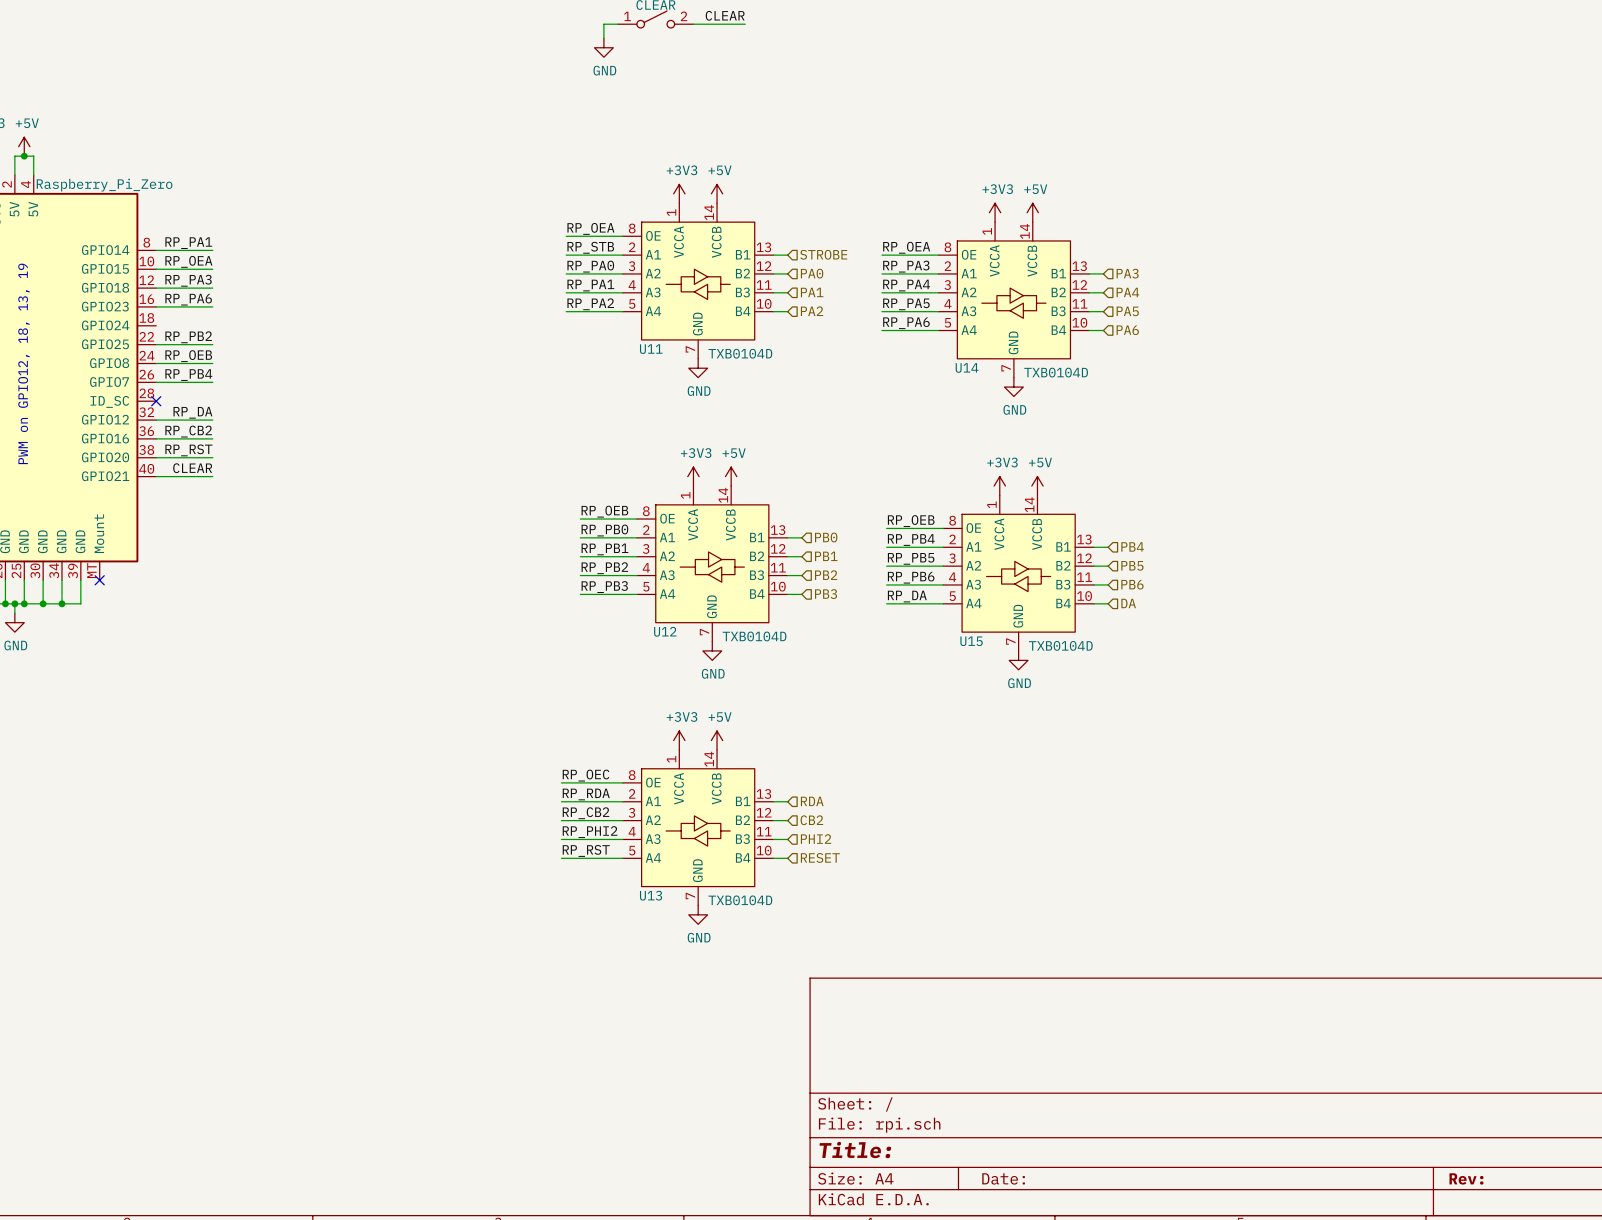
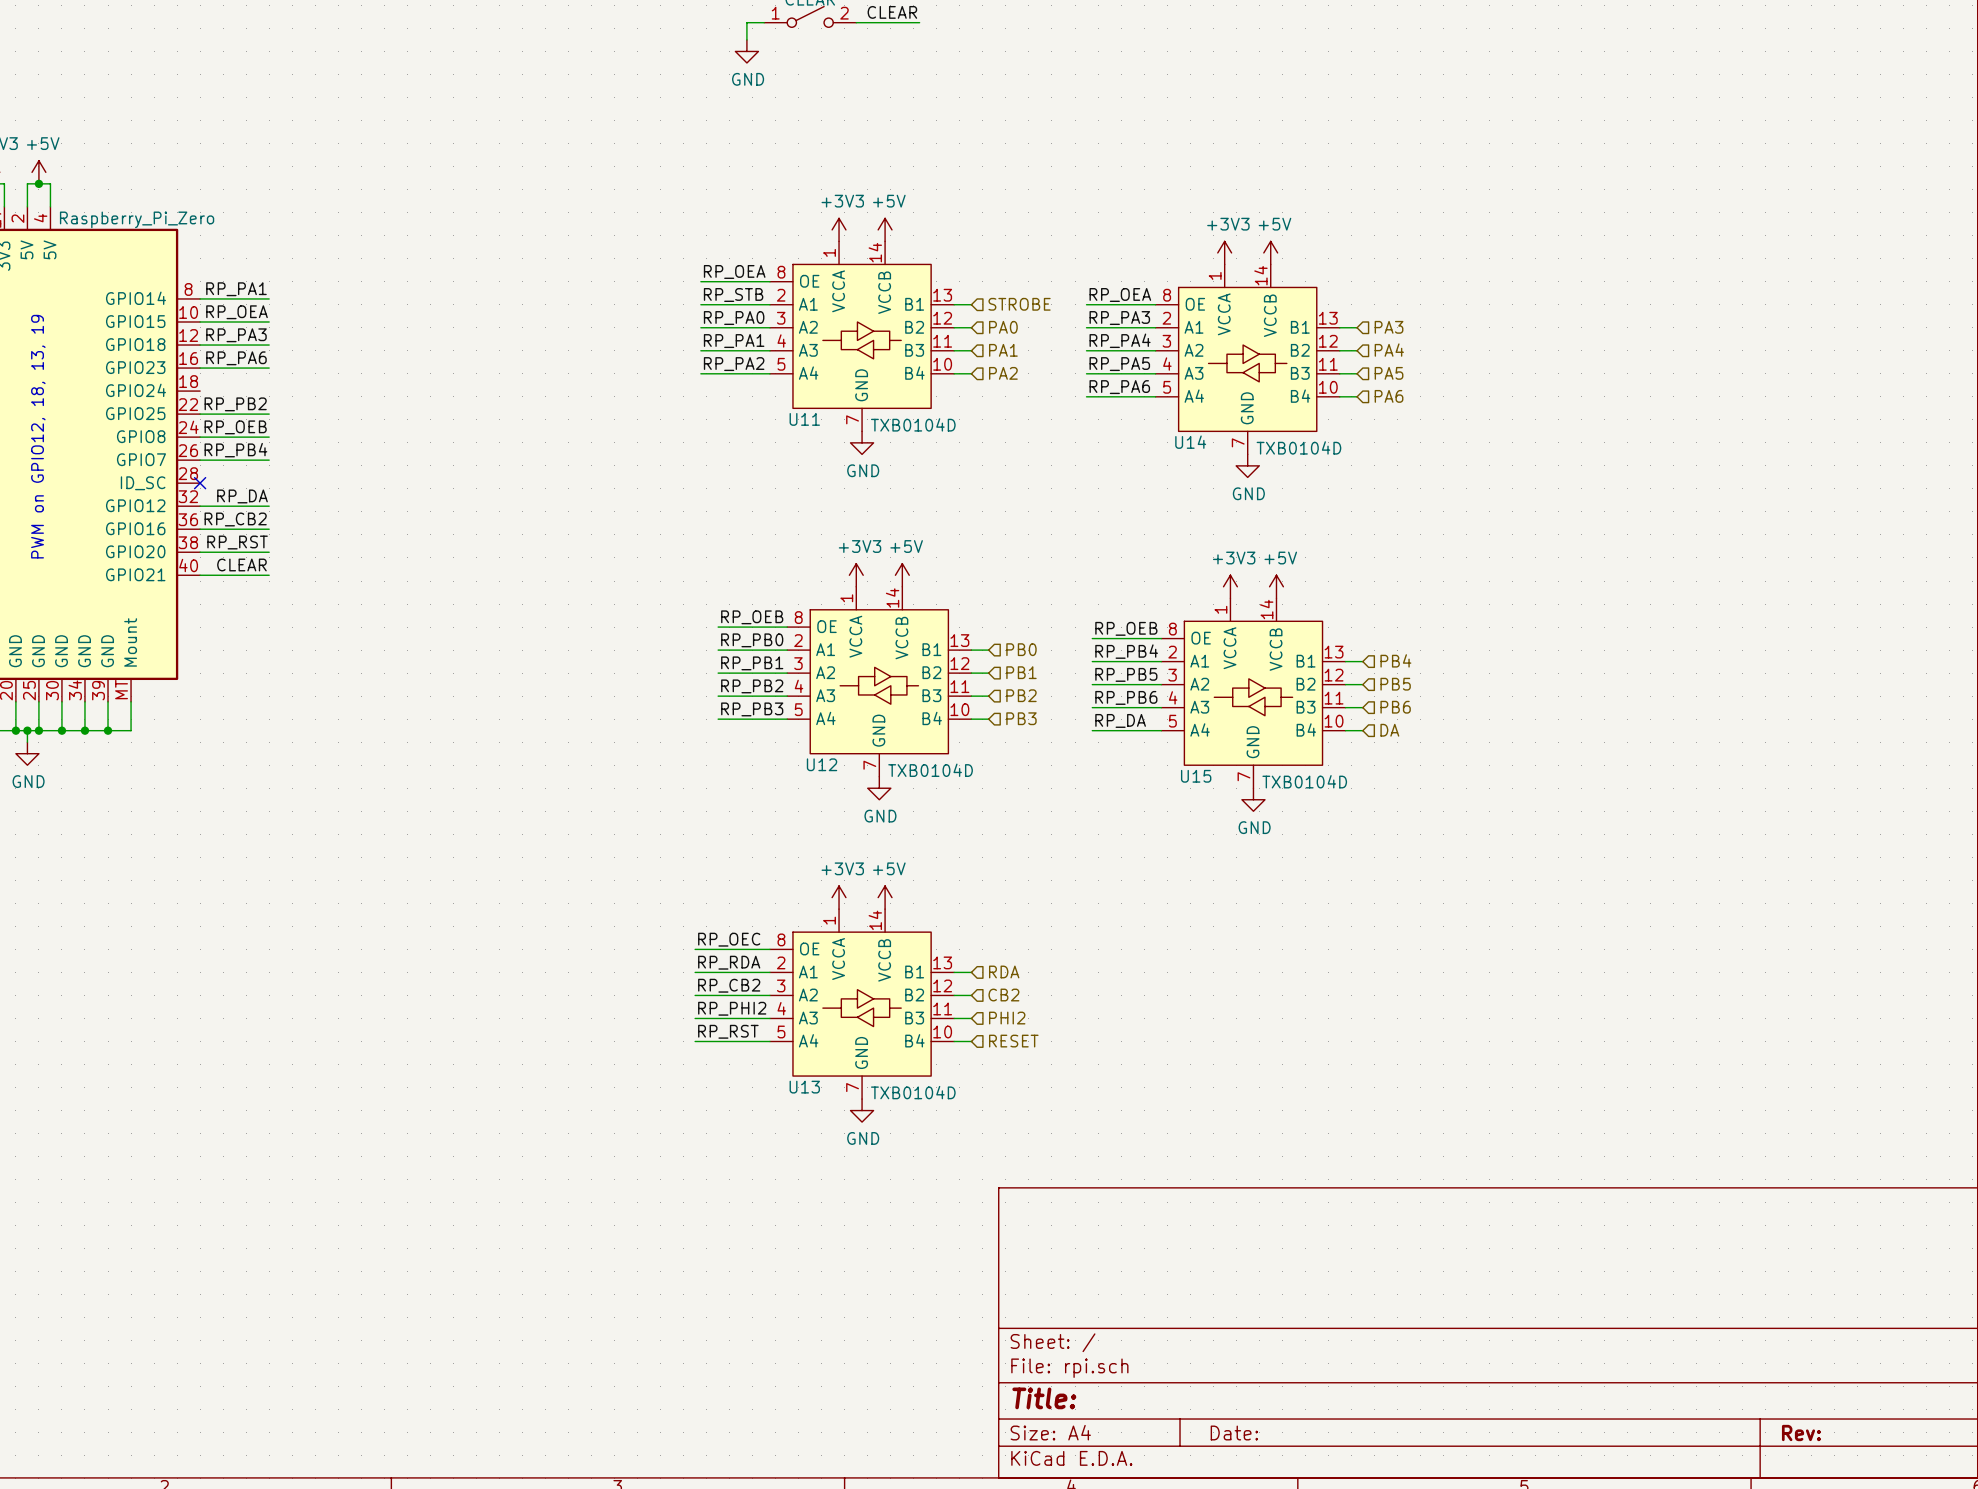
wire: none -> (131, 701) (131, 730) (108, 730)
no-connect mark: (99, 580) -> none
junction: none -> (108, 730)

